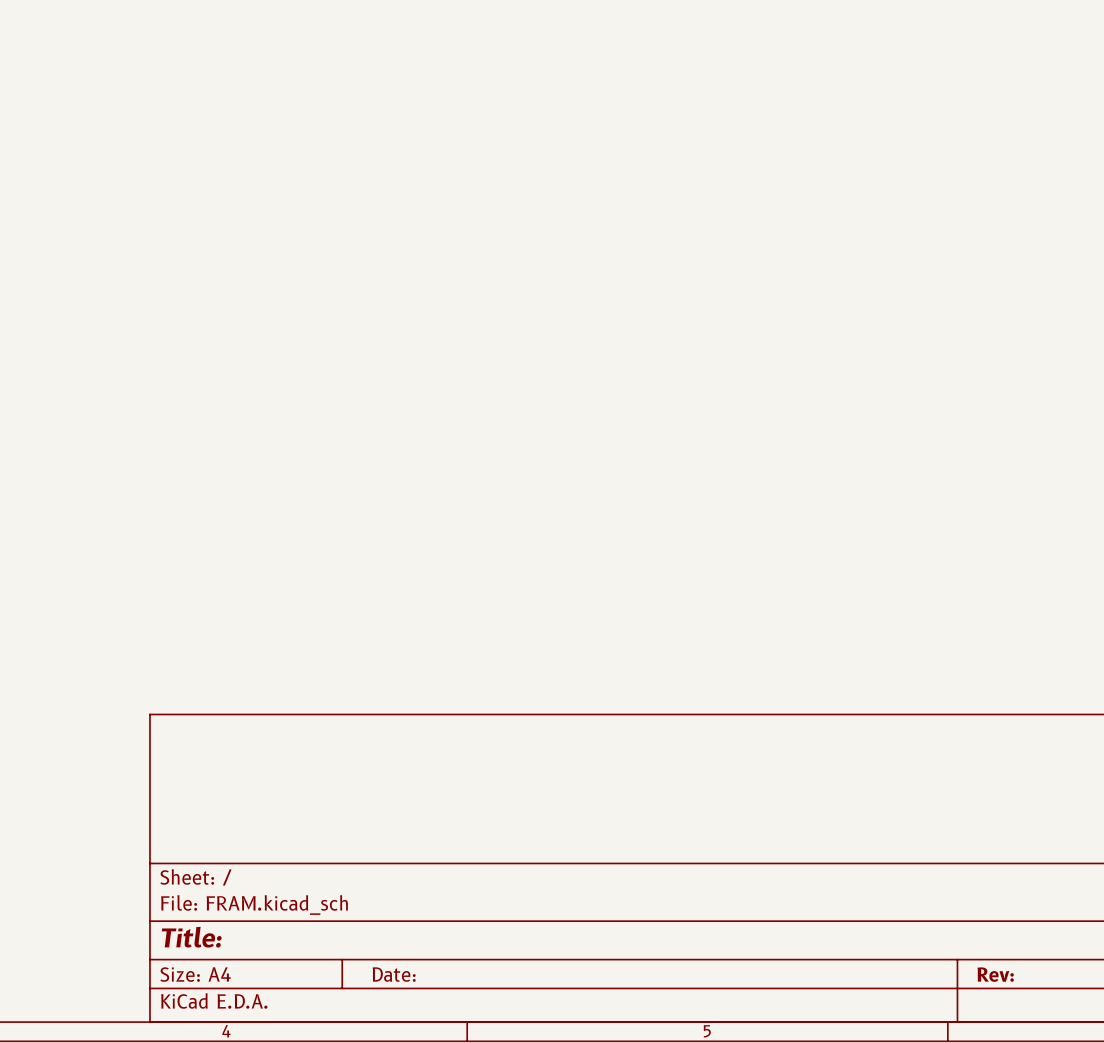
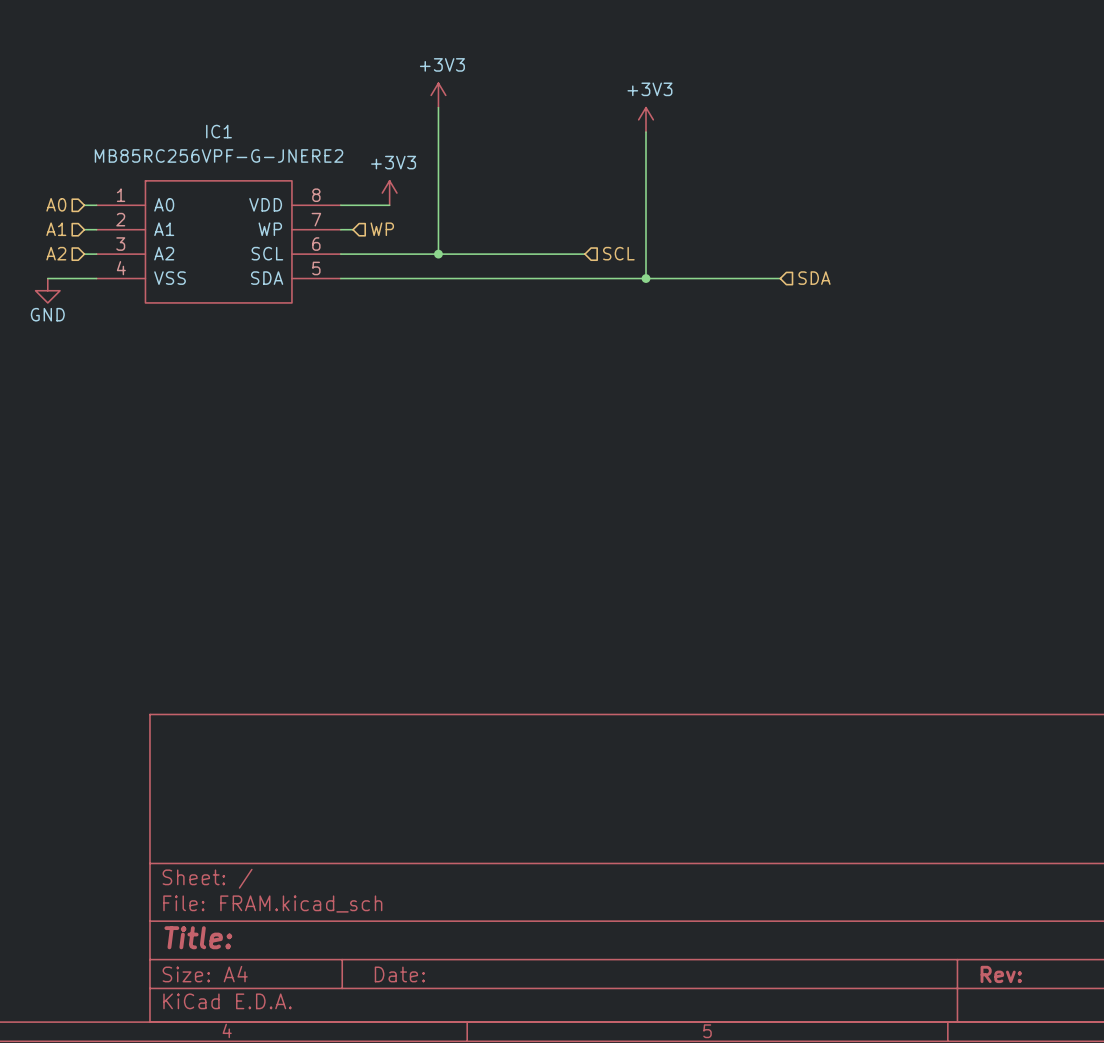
power symbol: none -> +3V3 (438, 95)
wire: none -> (438, 107) (438, 254)
power symbol: none -> +3V3 (646, 119)
wire: none -> (646, 132) (646, 278)
power symbol: none -> +3V3 (389, 193)
hierarchical label: none -> A0 (56, 204)
wire: none -> (84, 205) (96, 205)
wire: none -> (340, 205) (389, 205)
hierarchical label: none -> A1 (56, 229)
wire: none -> (84, 229) (96, 229)
wire: none -> (340, 229) (353, 229)
hierarchical label: none -> WP (382, 229)
IC1: none -> MB85RC256VPF-G-JNERE2 (218, 241)
hierarchical label: none -> A2 (56, 253)
hierarchical label: none -> SCL (618, 253)
wire: none -> (84, 254) (96, 254)
wire: none -> (340, 254) (584, 254)
junction: none -> (438, 254)
wire: none -> (47, 278) (96, 278)
wire: none -> (340, 278) (780, 278)
junction: none -> (646, 278)
hierarchical label: none -> SDA (814, 278)
power symbol: none -> GND (47, 290)

